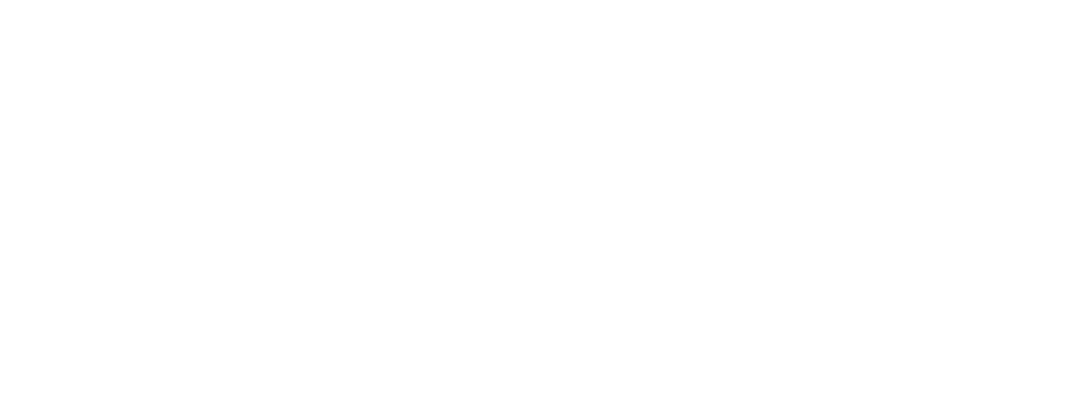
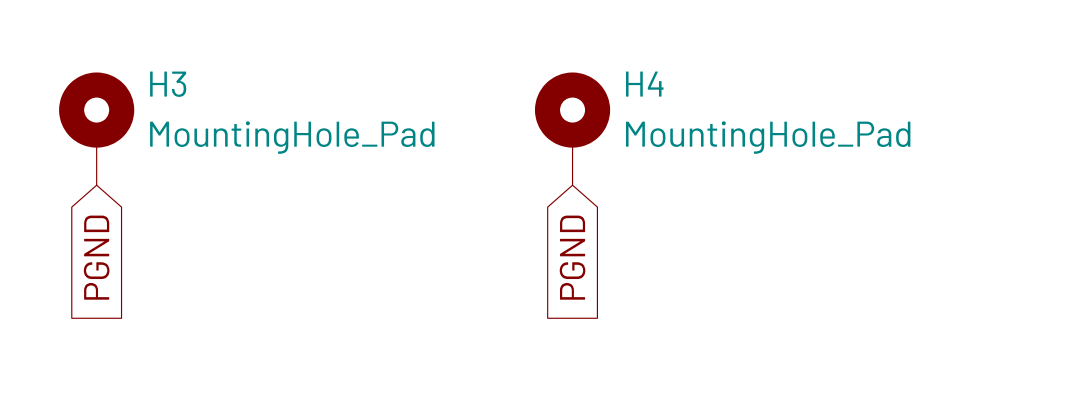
H3: none -> MountingHole_Pad (96, 128)
H4: none -> MountingHole_Pad (572, 128)
global label: none -> PGND (96, 257)
global label: none -> PGND (572, 257)

